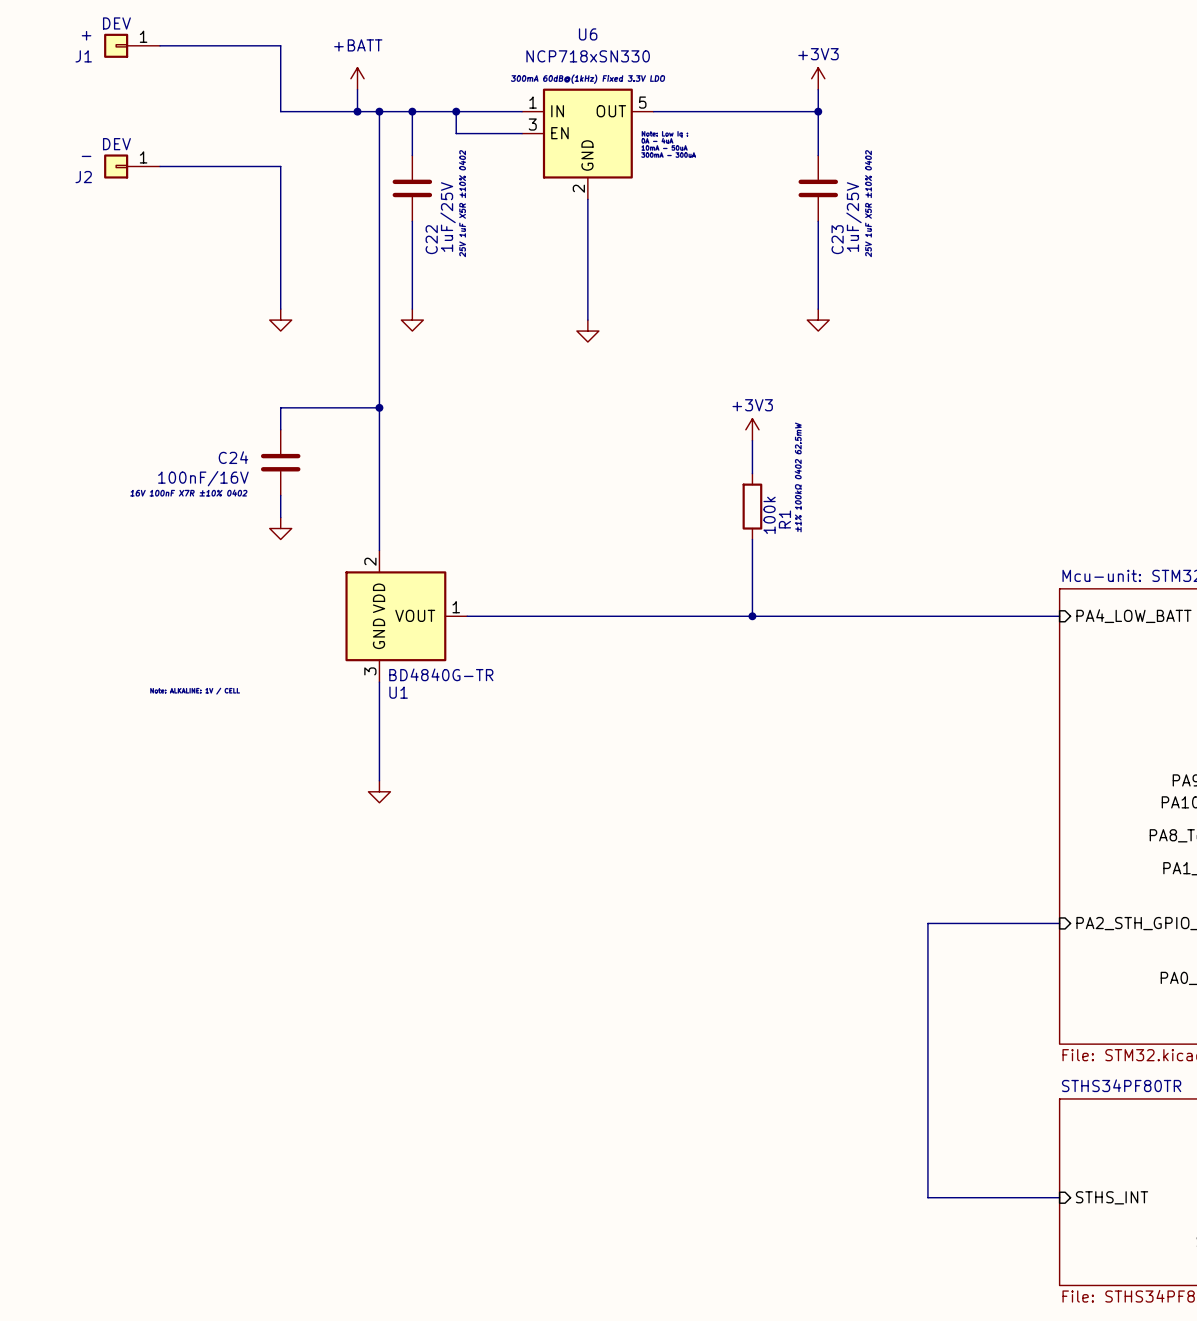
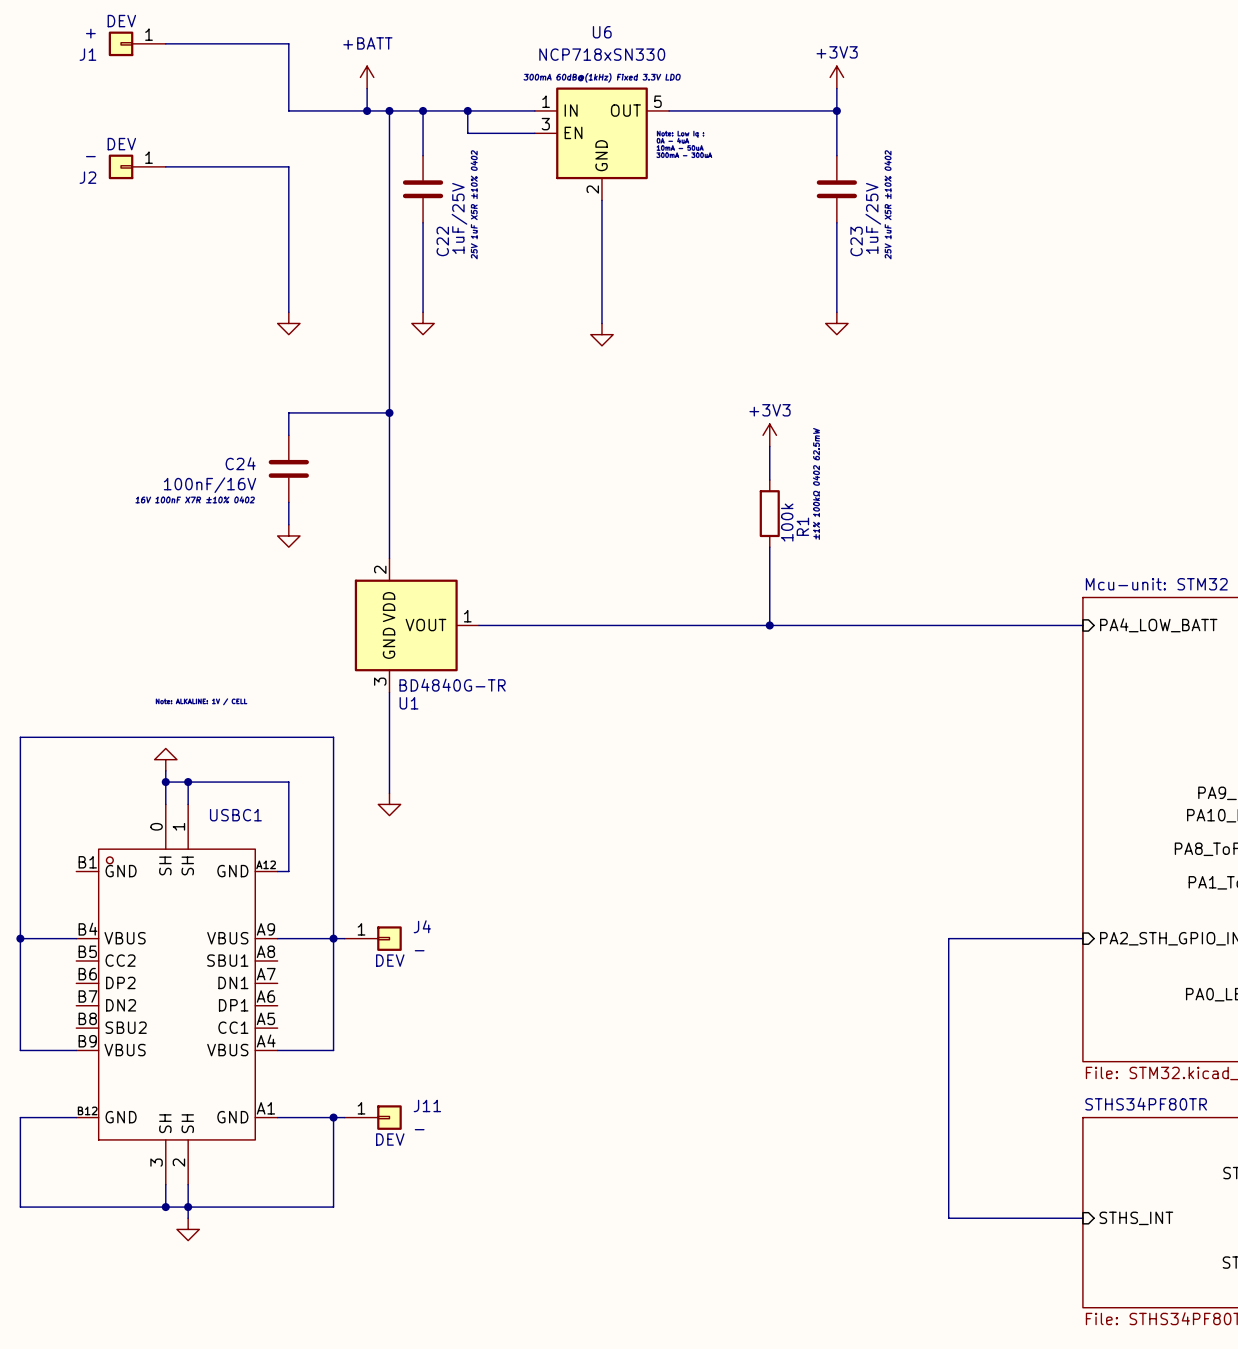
power symbol: none -> (165, 759)
wire: none -> (165, 770) (165, 804)
wire: none -> (165, 782) (288, 782) (288, 871) (277, 871)
junction: none -> (165, 782)
wire: none -> (188, 782) (188, 804)
junction: none -> (188, 782)
wire: none -> (20, 938) (76, 938)
junction: none -> (20, 938)
wire: none -> (277, 938) (344, 938)
junction: none -> (333, 938)
J4: none -> - (373, 938)
USBC1: none -> (176, 994)
wire: none -> (76, 1050) (20, 1050) (20, 737) (333, 737) (333, 1050) (277, 1050)
wire: none -> (76, 1117) (20, 1117) (20, 1207) (333, 1207) (333, 1117)
wire: none -> (277, 1117) (344, 1117)
junction: none -> (333, 1117)
J11: none -> - (373, 1117)
wire: none -> (165, 1184) (165, 1207)
wire: none -> (188, 1184) (188, 1218)
junction: none -> (165, 1207)
junction: none -> (188, 1207)
power symbol: none -> (188, 1229)

